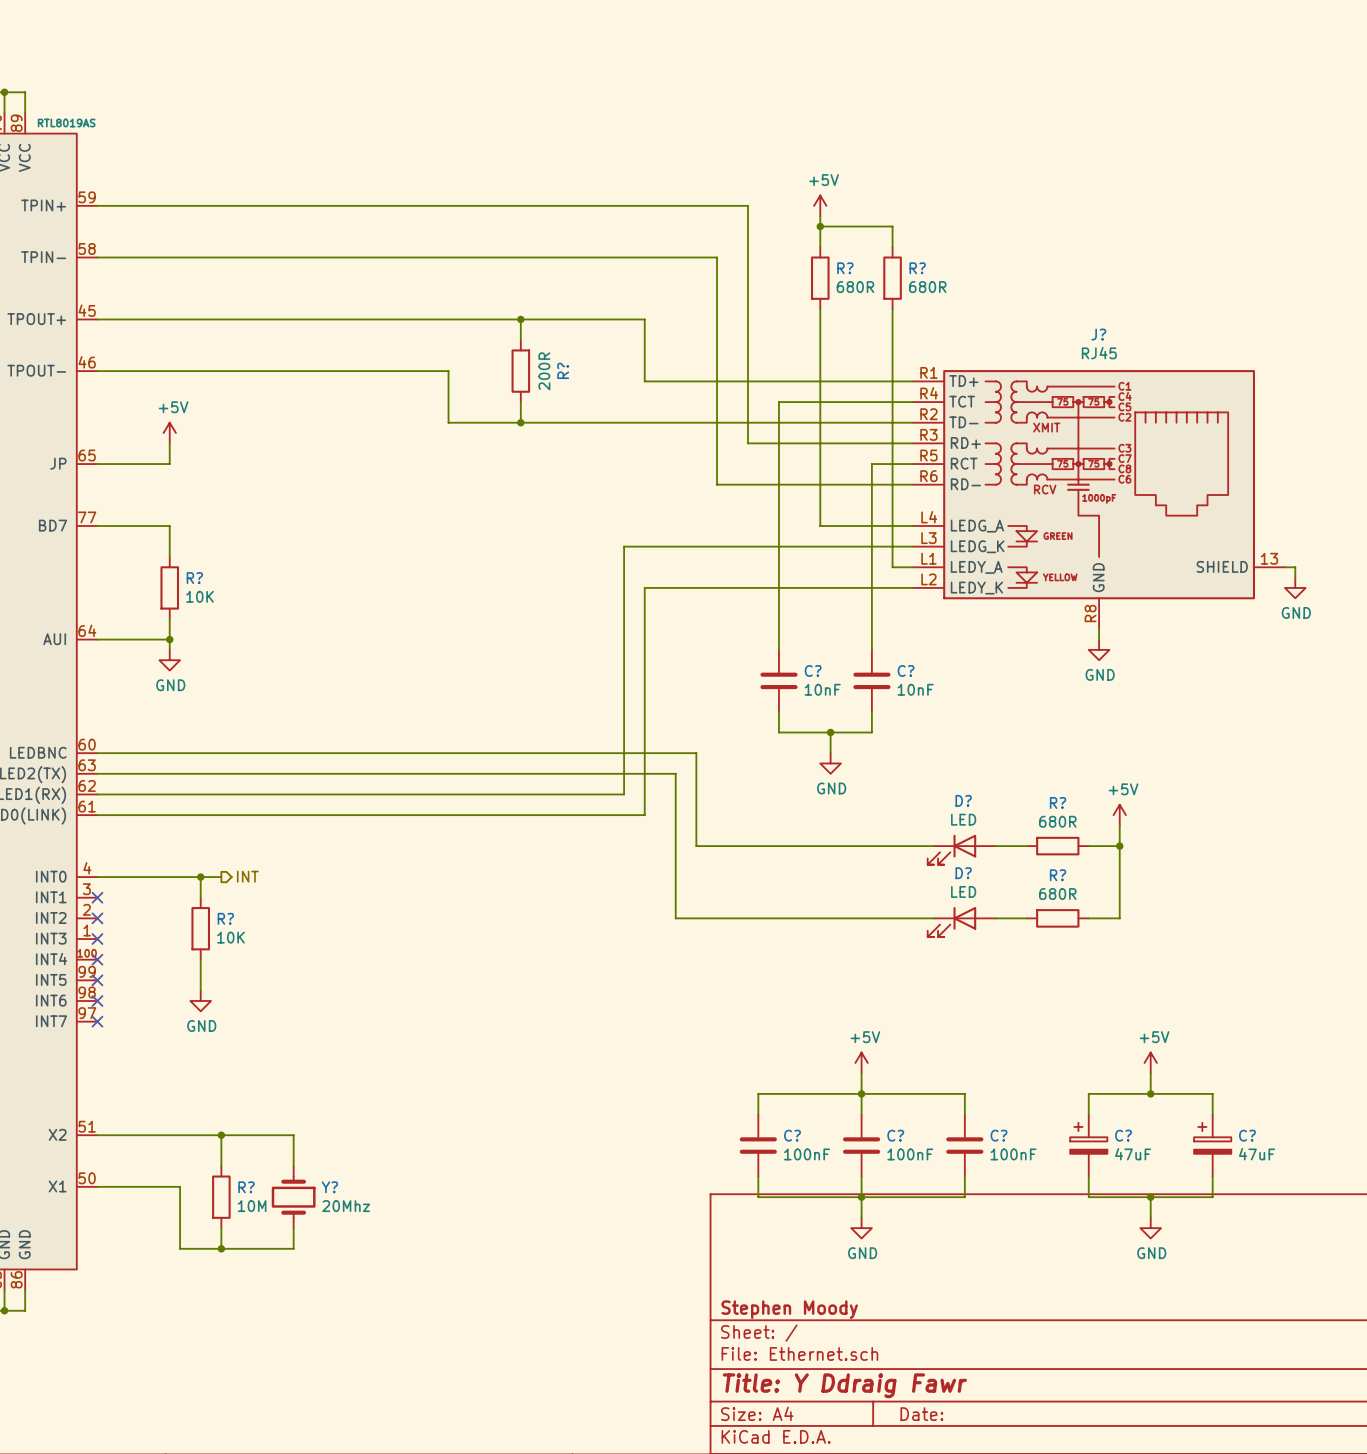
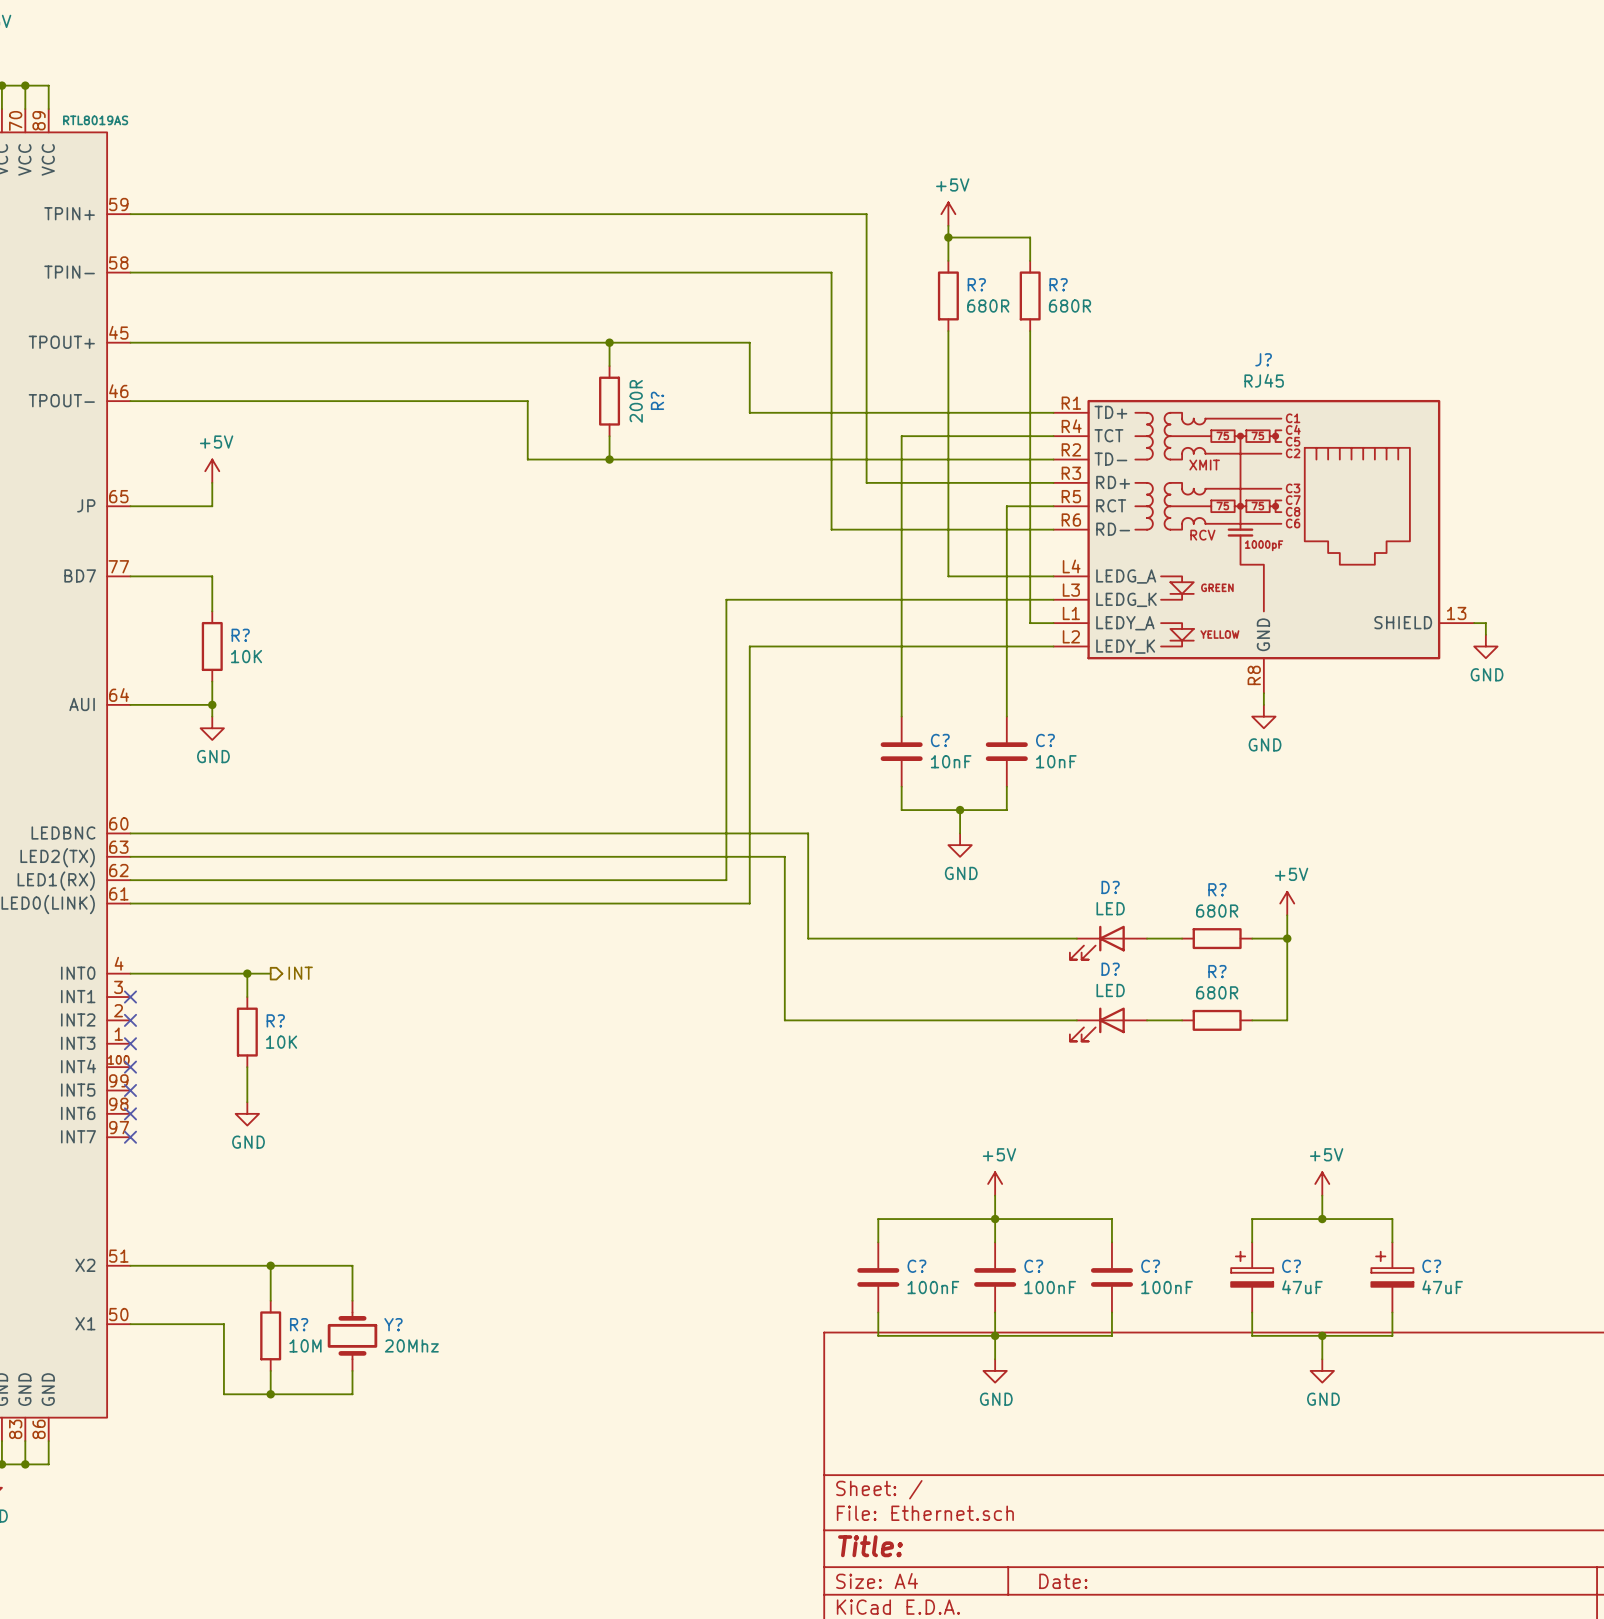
title block: Stephen Moody (789, 1309) -> none
title block: Title: Y Ddraig Fawr (844, 1385) -> Title: (870, 1546)

